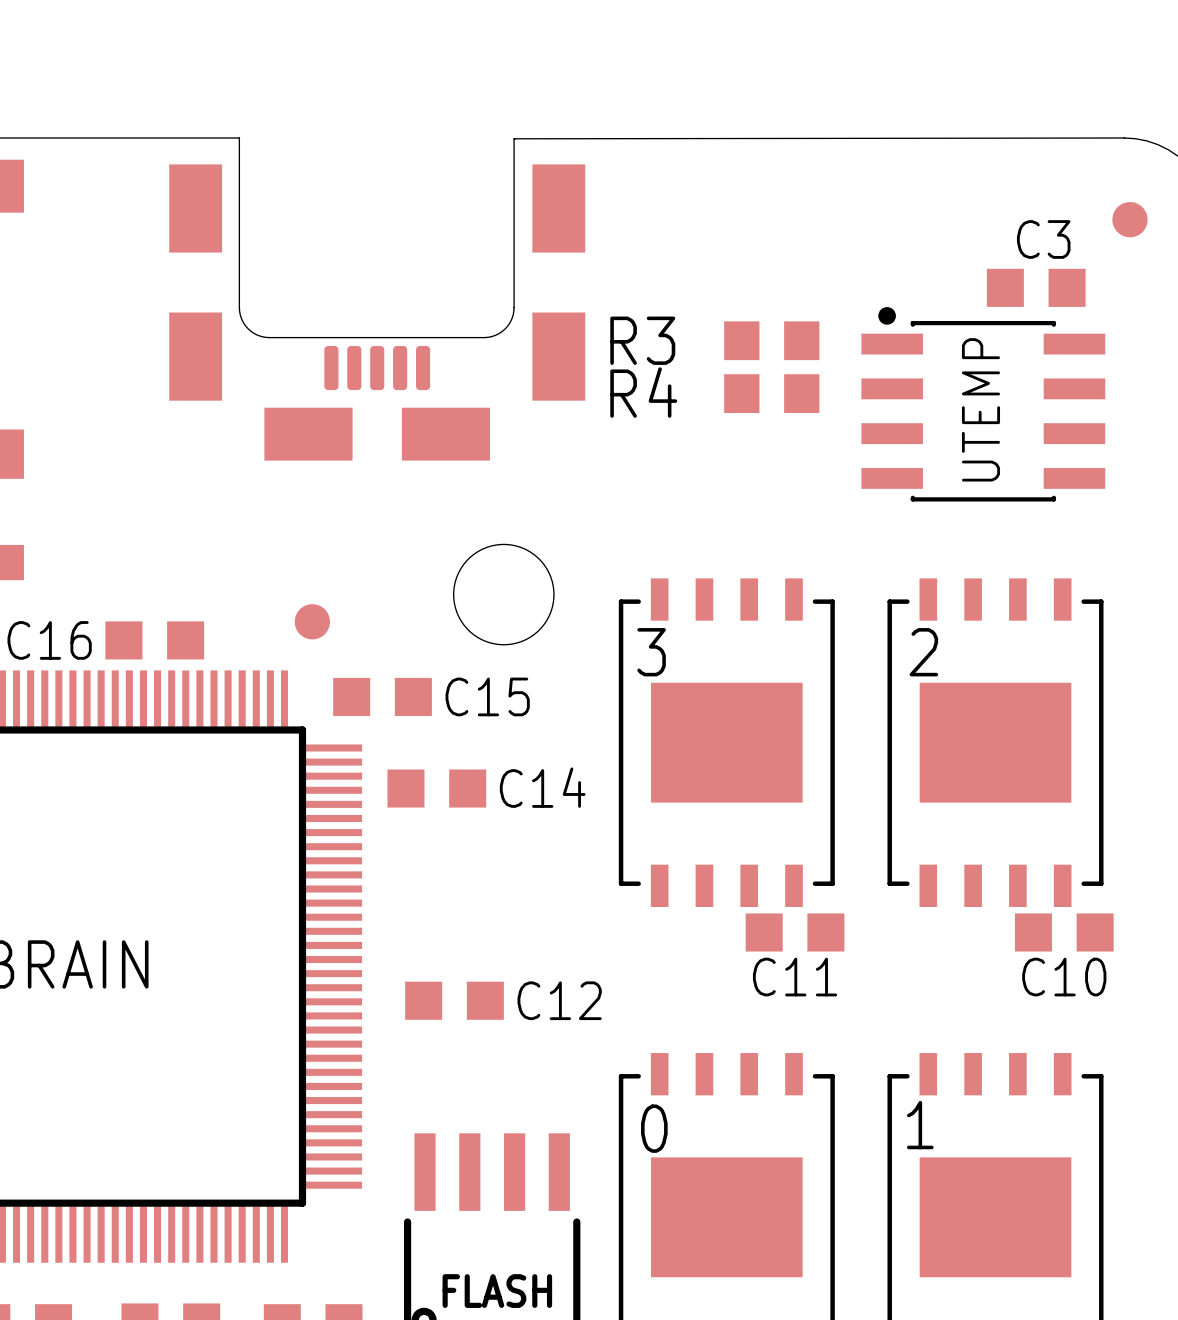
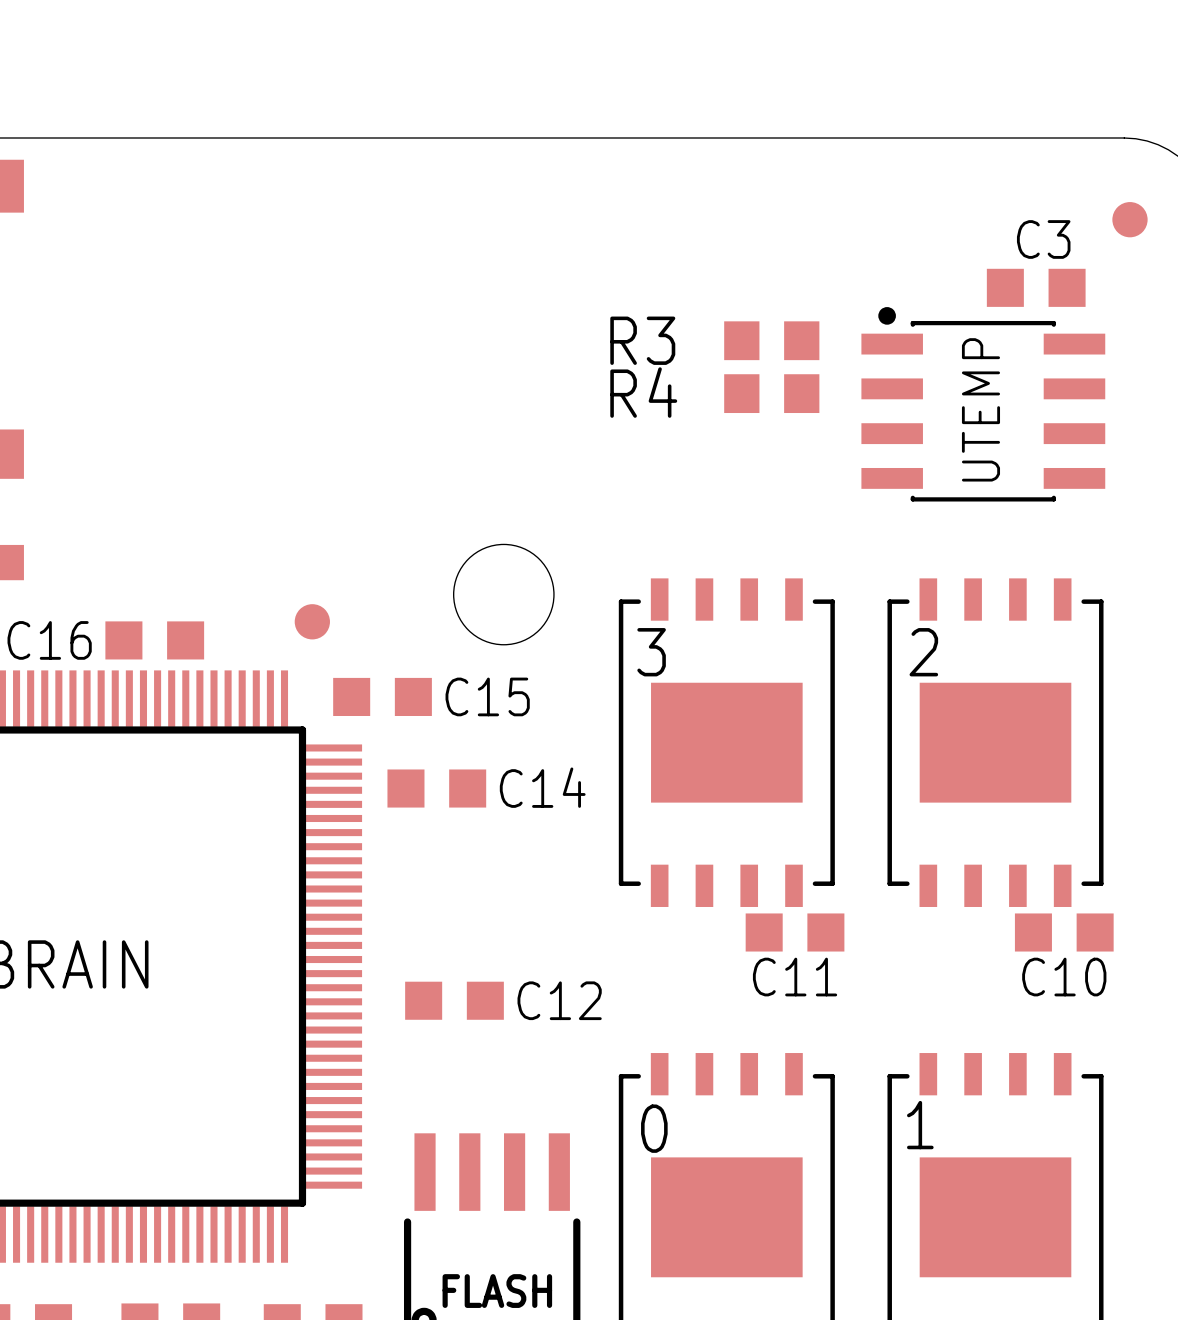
board edge: (239, 138) (239, 311) (243, 322) (251, 331) (257, 335) (269, 337) (484, 337) (495, 335) (502, 331) (511, 319) (514, 307) (514, 138) (1124, 138) -> (239, 138) (1124, 138)
part: (377, 312) -> none

